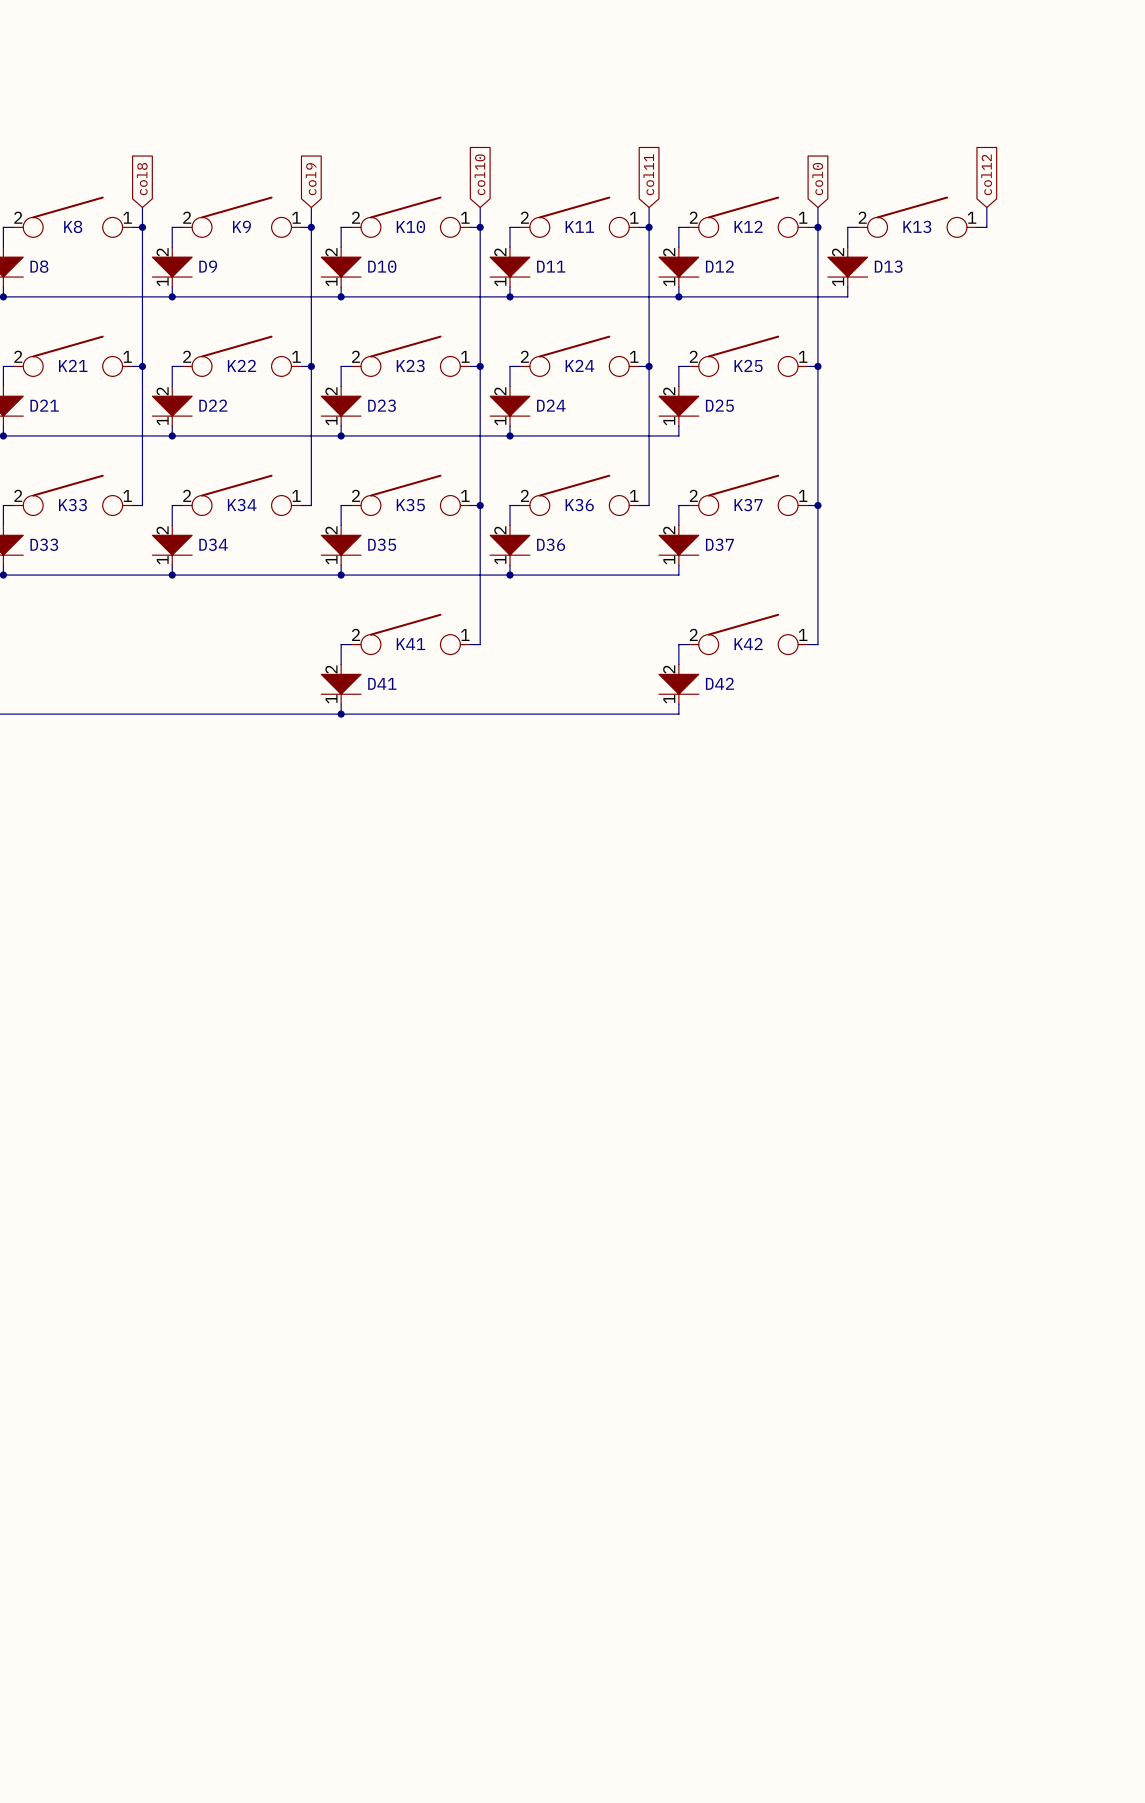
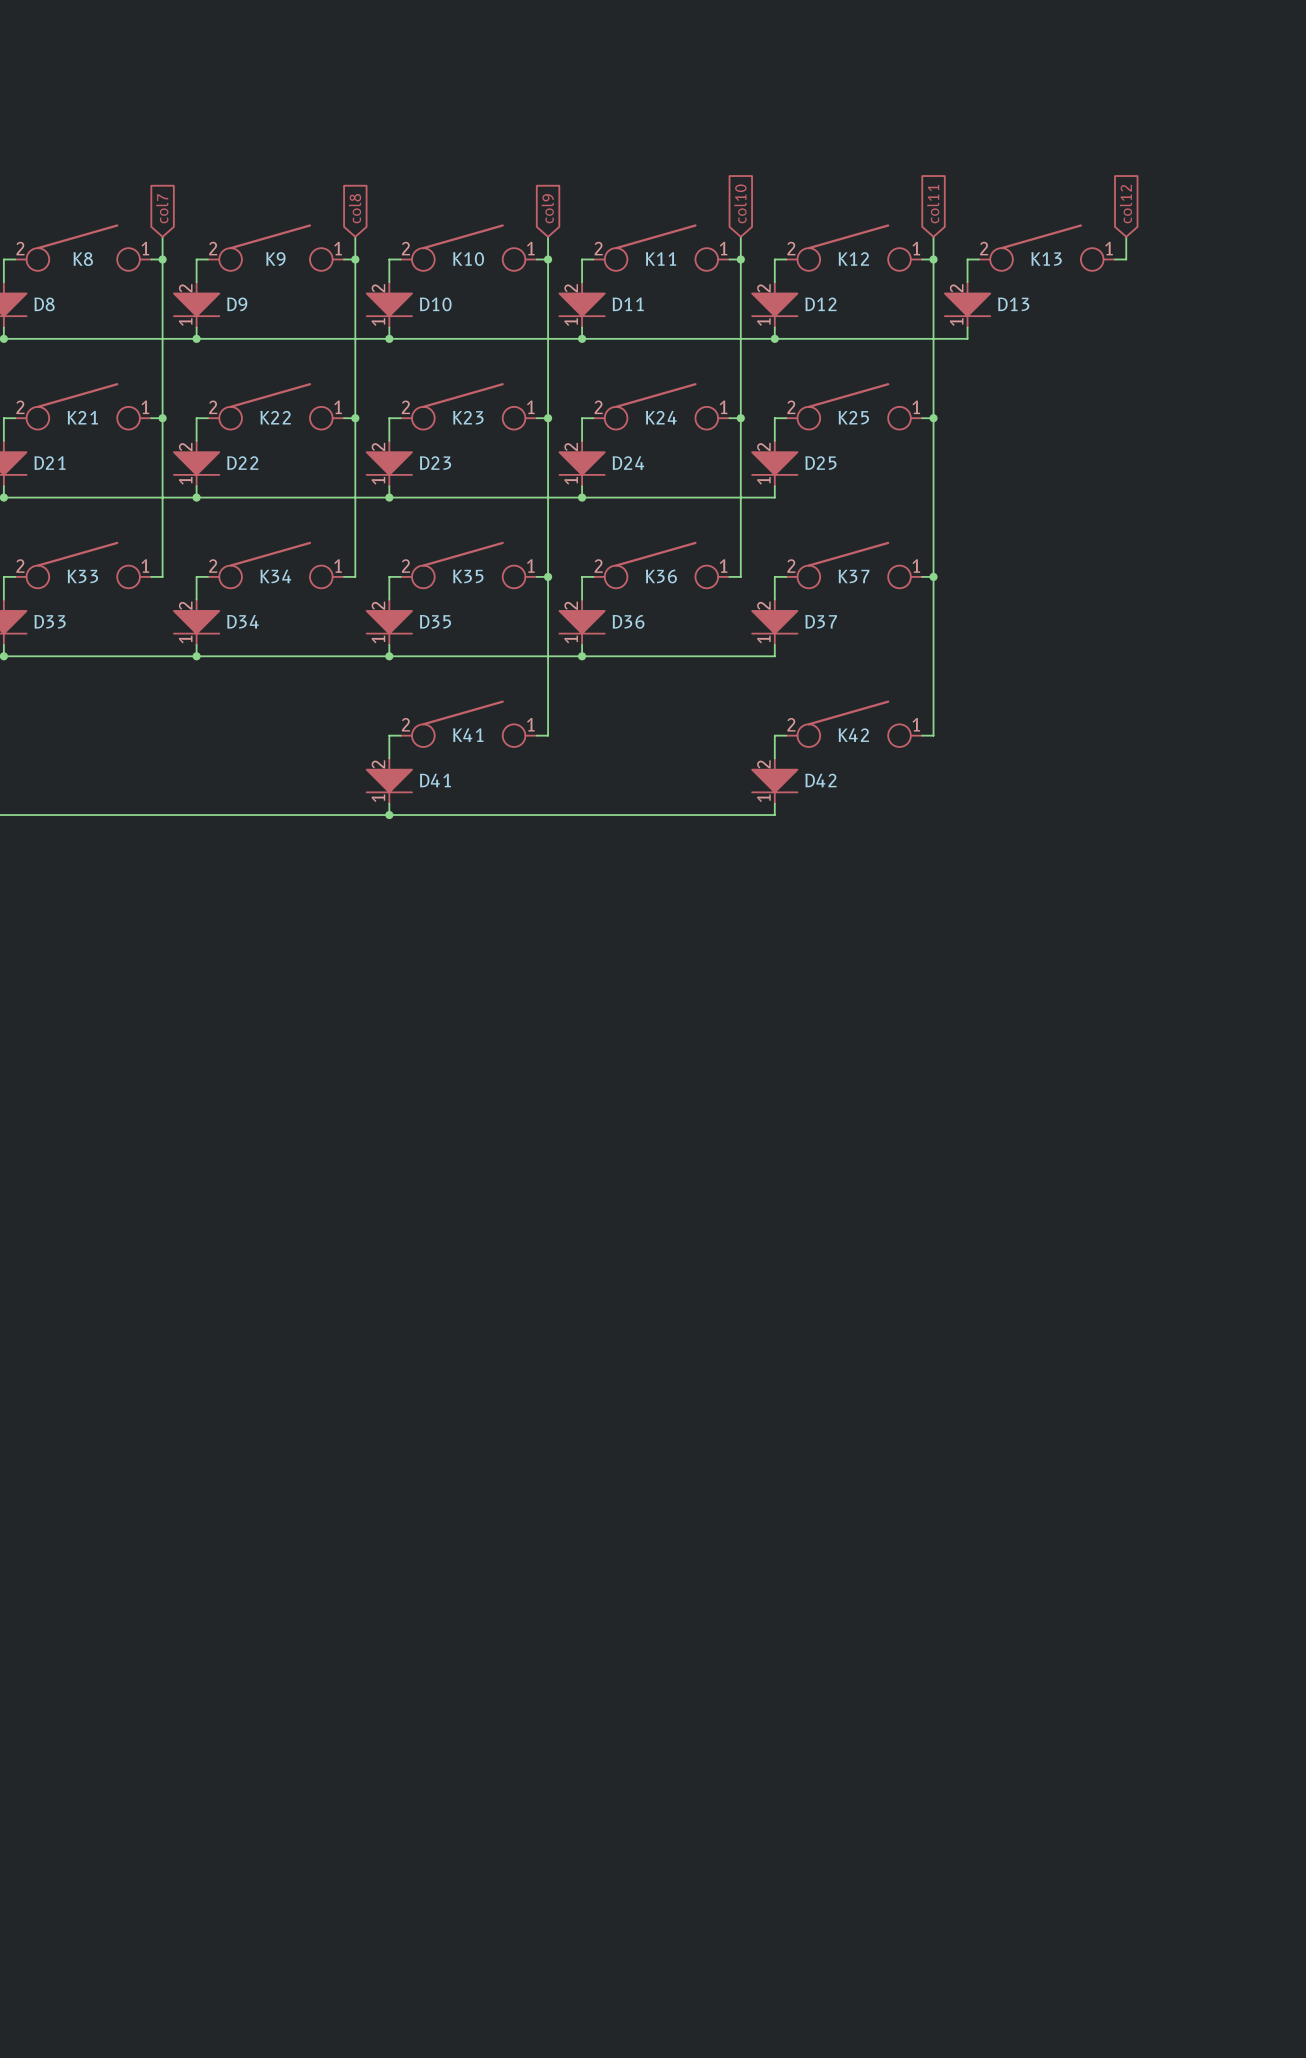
global label: col10 (479, 174) -> col9 (547, 208)
global label: col11 (648, 174) -> col10 (740, 203)
global label: col8 (142, 179) -> col7 (162, 208)
global label: col9 (311, 179) -> col8 (355, 208)
global label: col0 (817, 179) -> col11 (933, 204)

